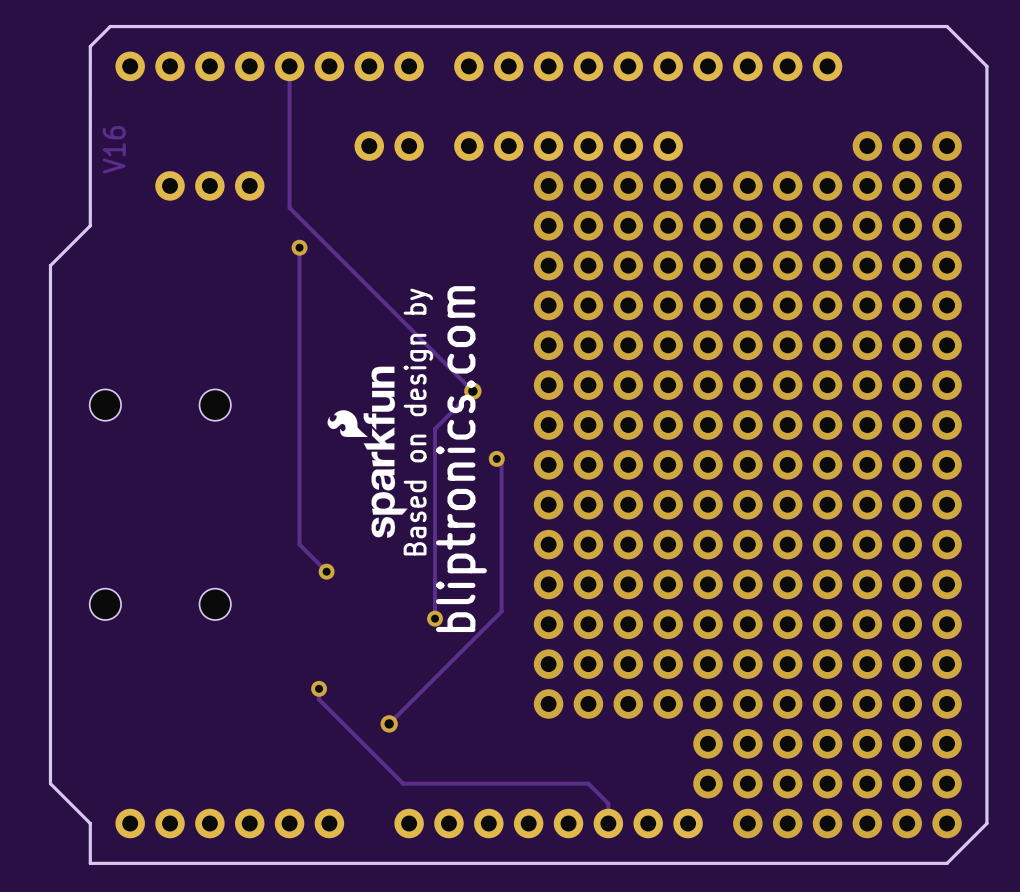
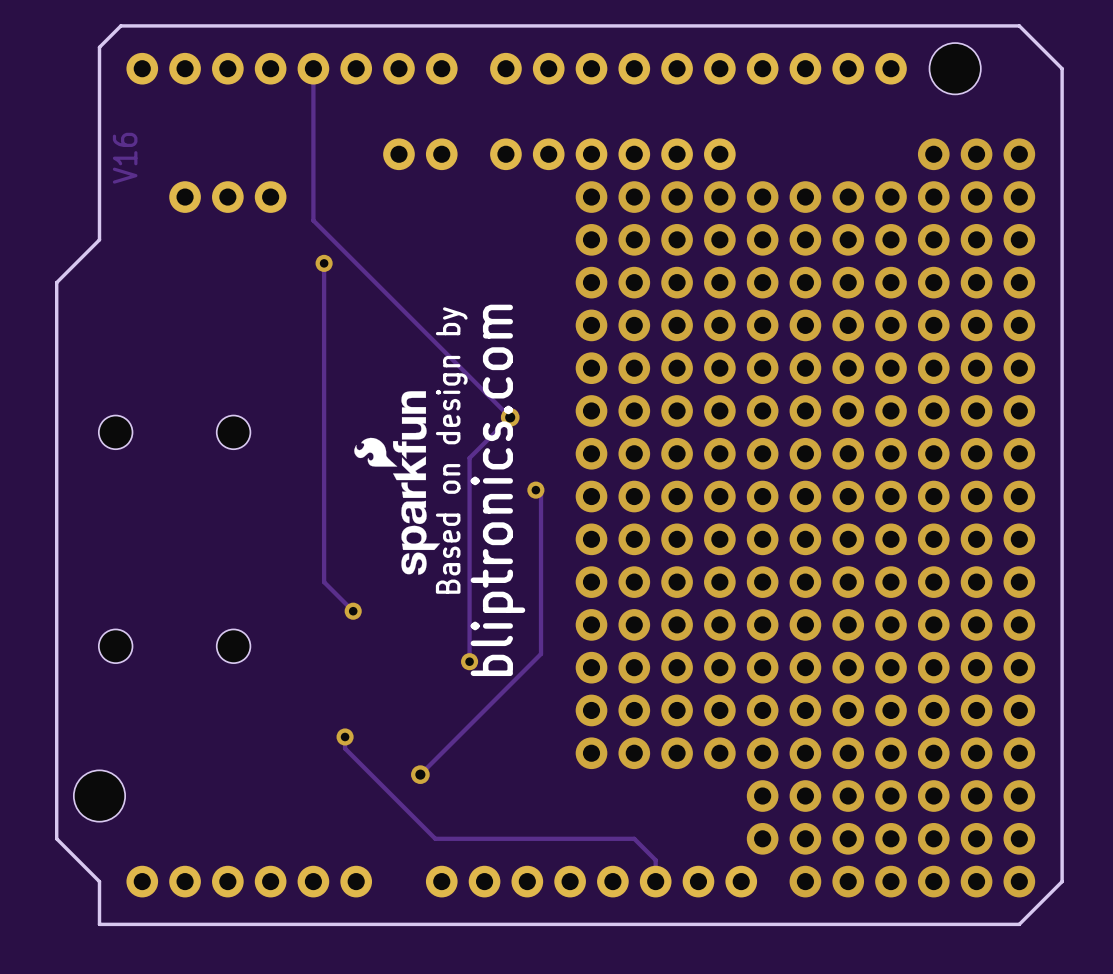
part: none -> (955, 68)
part: none -> (99, 796)

